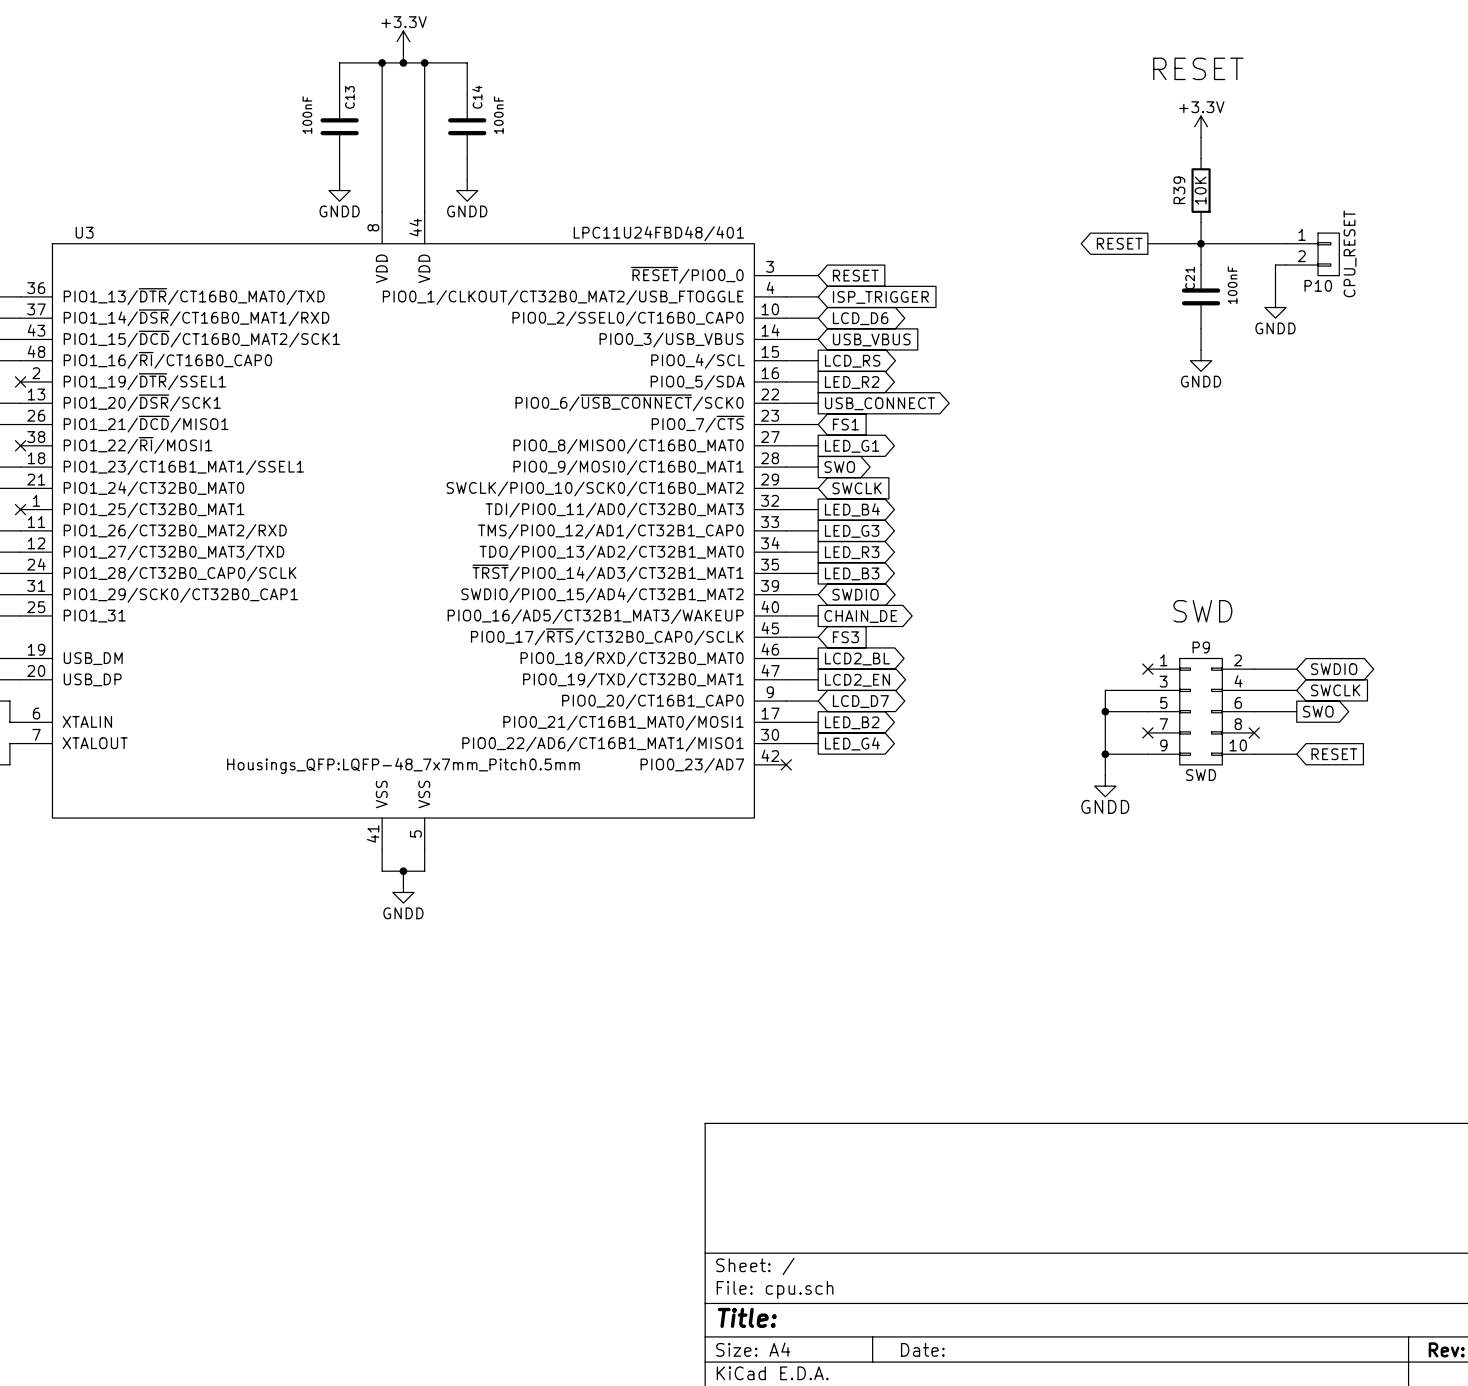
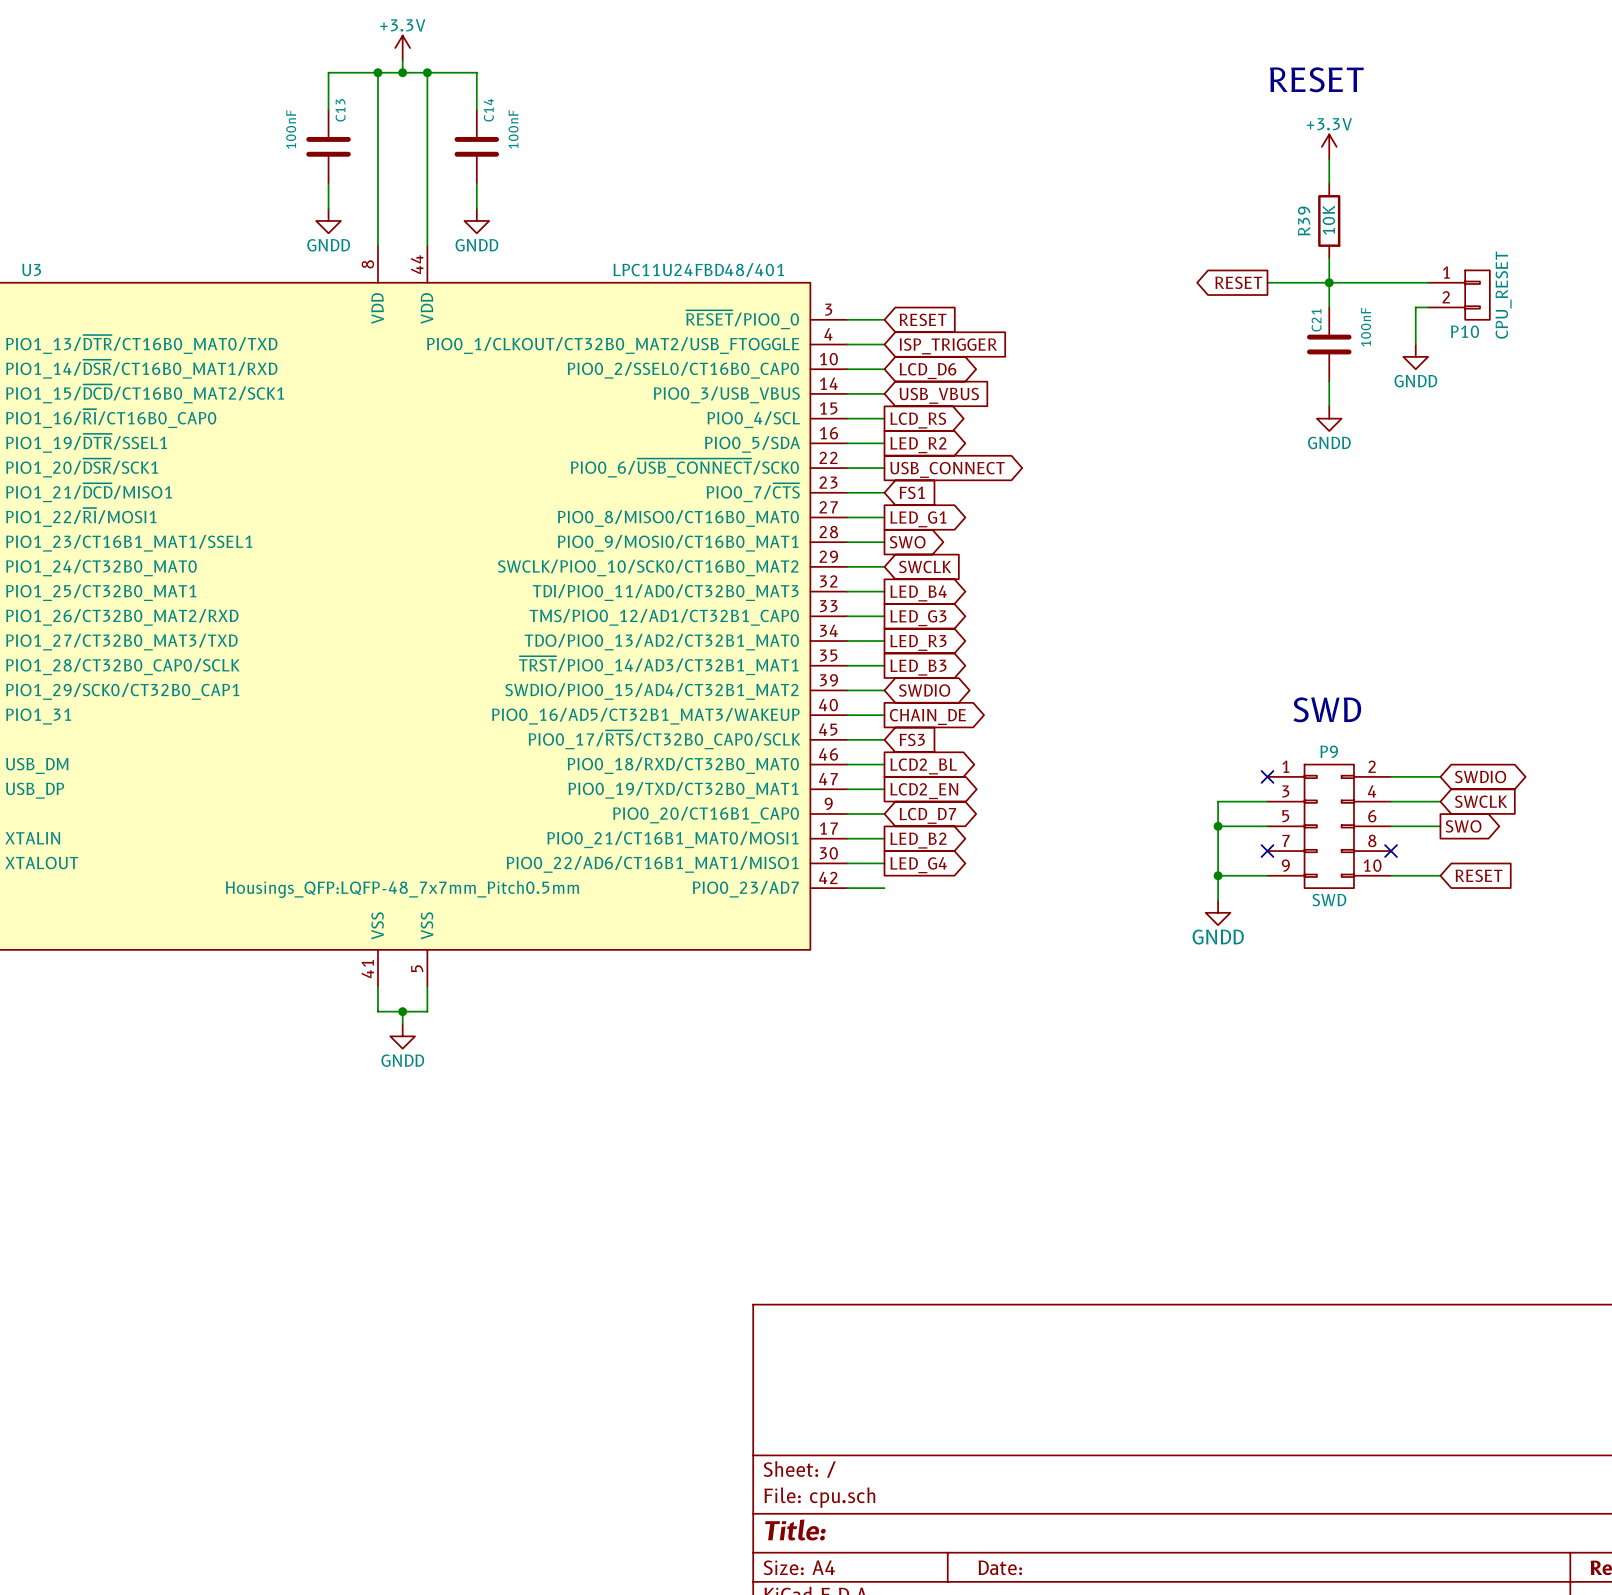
wire: none -> (847, 888) (884, 888)
no-connect mark: (786, 764) -> none

